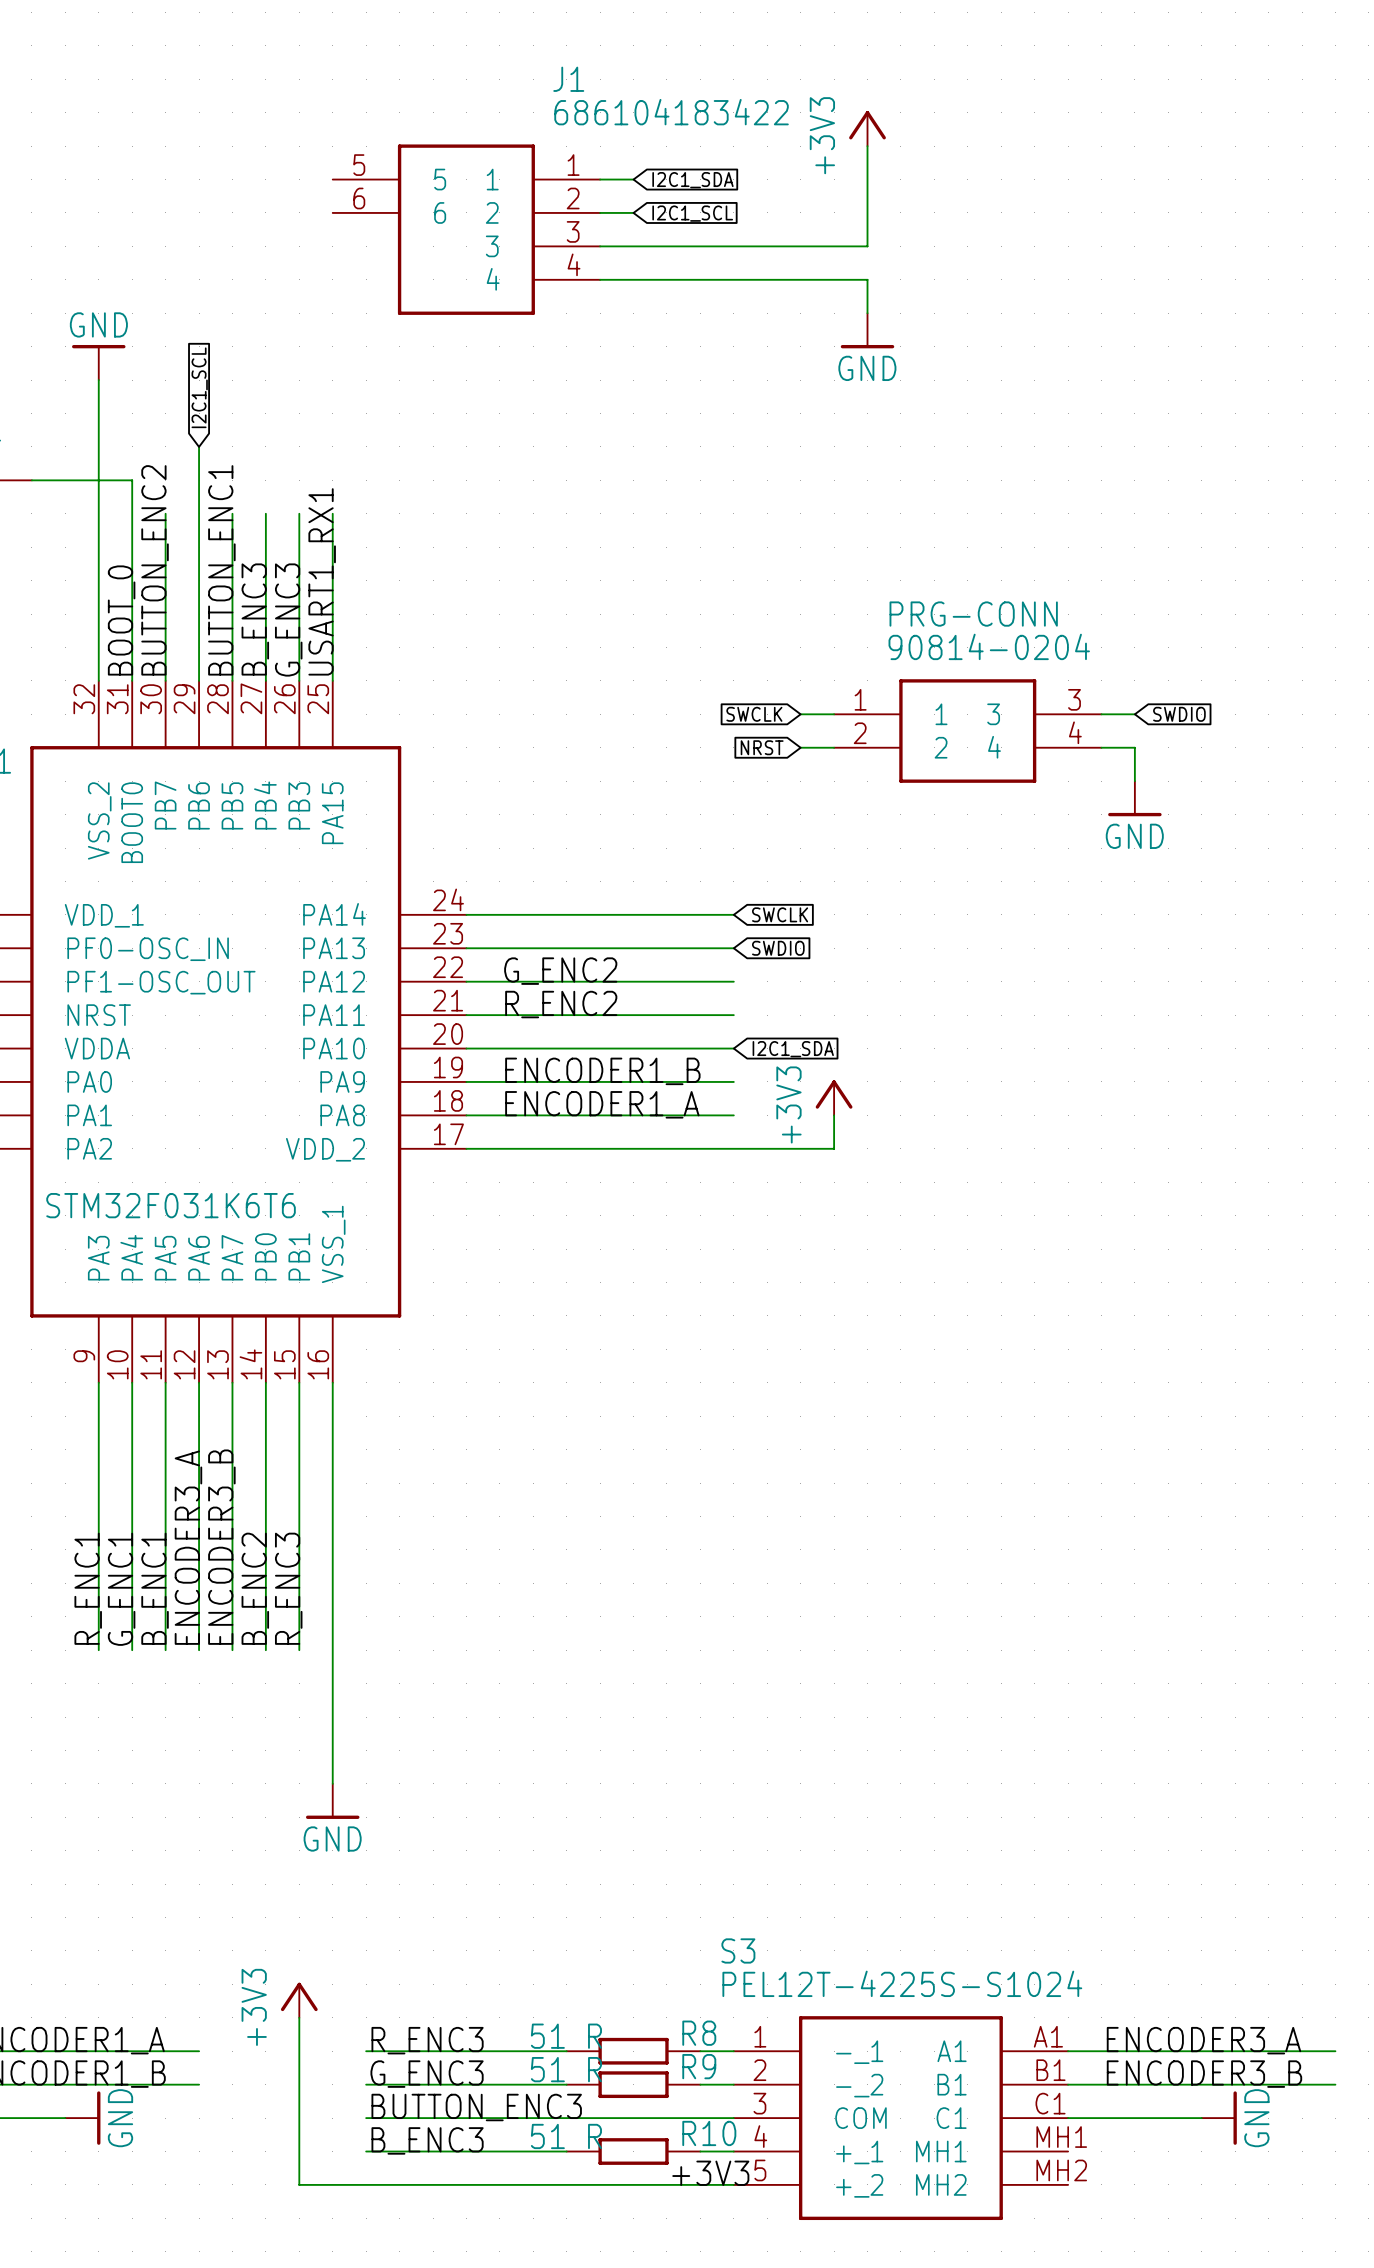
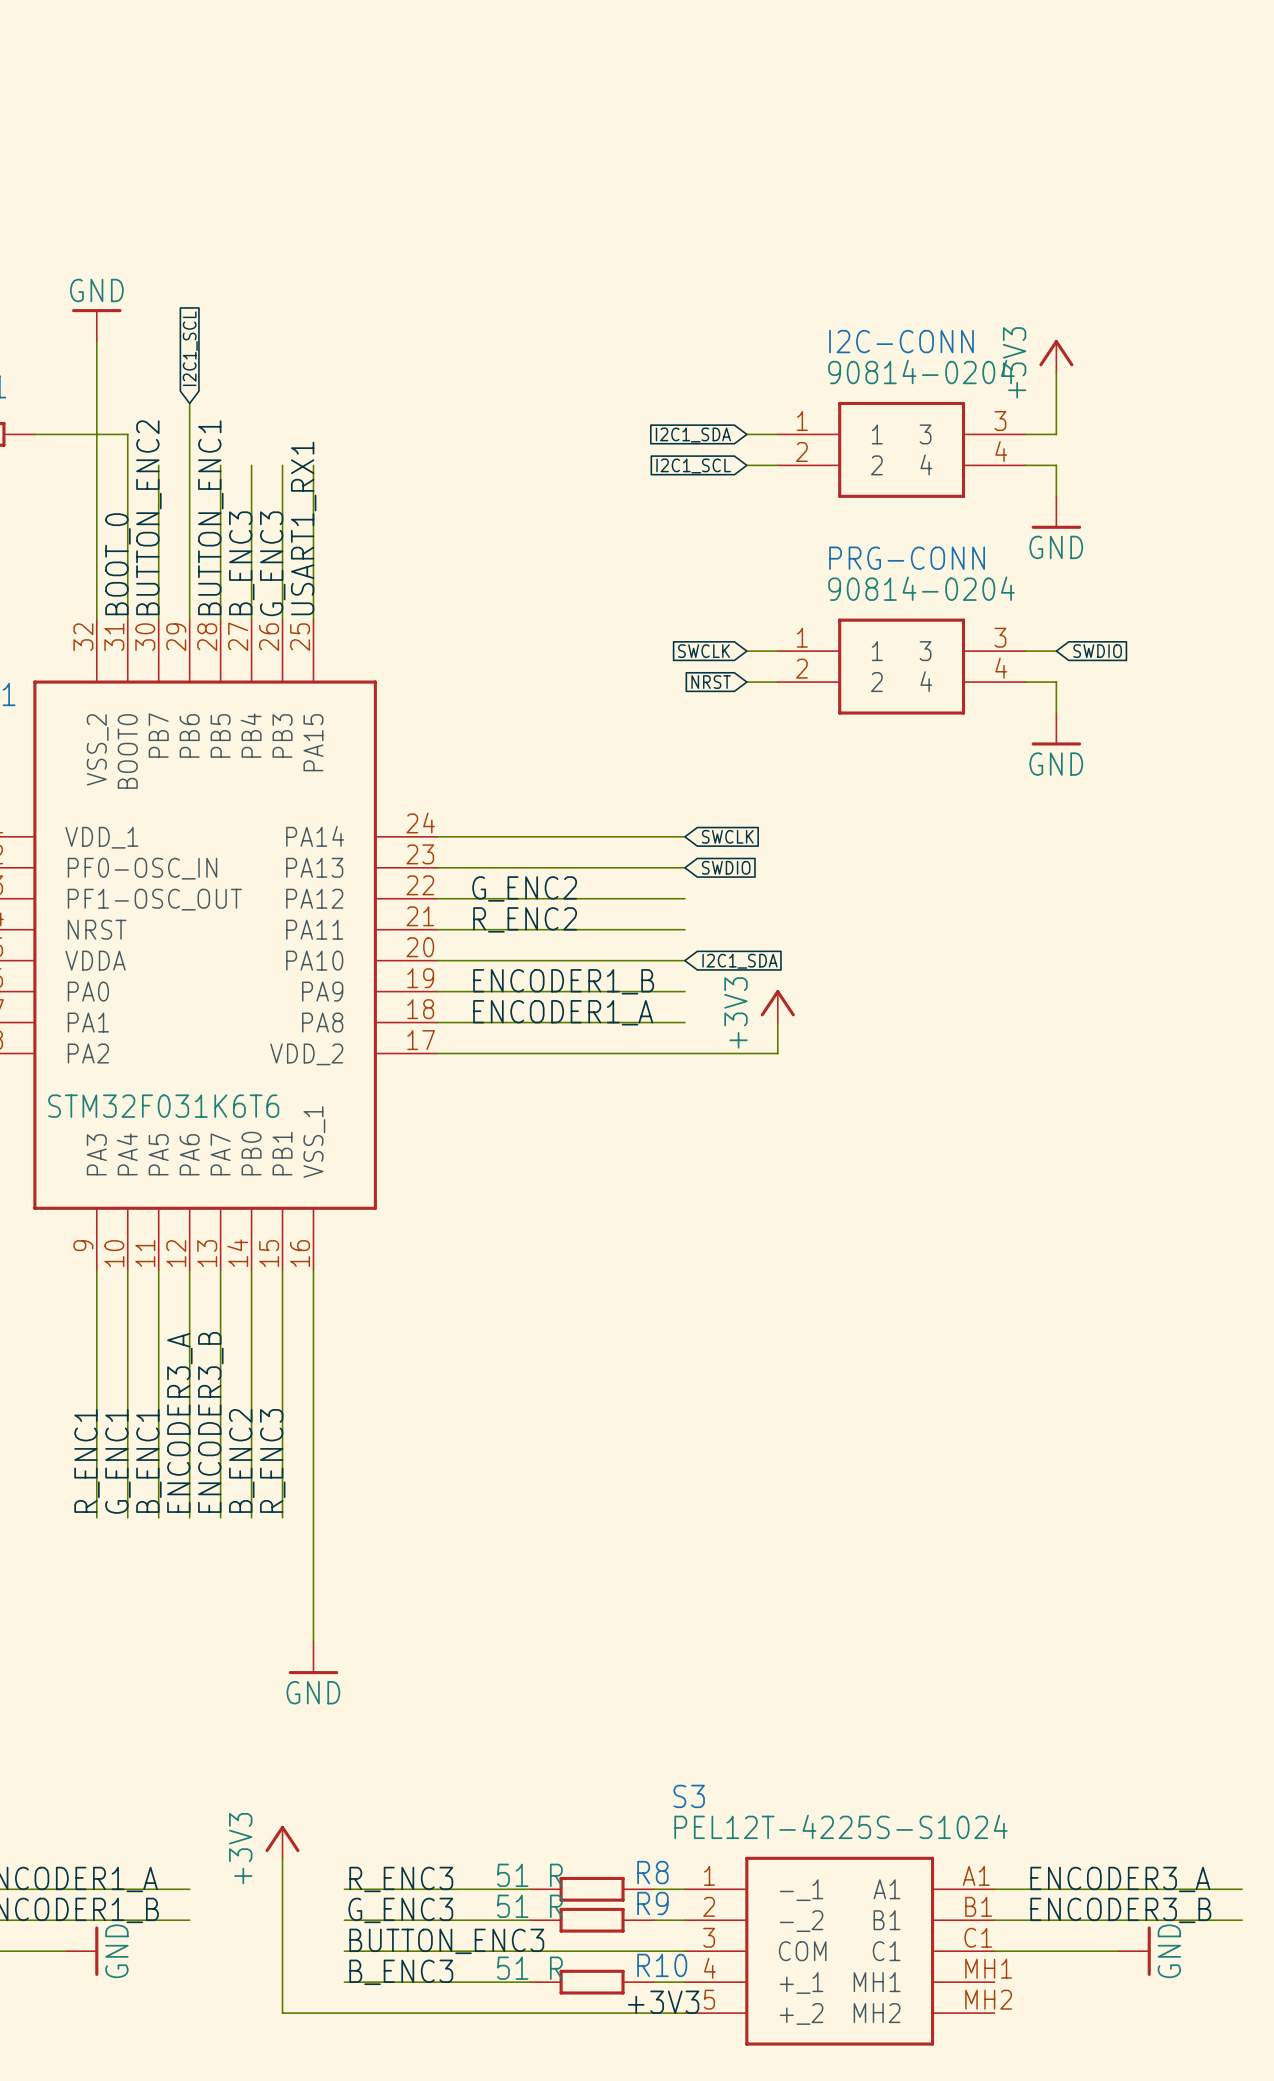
power symbol: +3V3 (867, 128) -> none
wire: (867, 146) (867, 246) (600, 246) -> none
wire: (600, 179) (633, 179) -> none
global label: I2C1_SDA (692, 180) -> none
wire: (600, 212) (633, 212) -> none
global label: I2C1_SCL (692, 213) -> none
J1: 686104183422 (466, 229) -> none
wire: (600, 279) (867, 279) (867, 313) -> none
power symbol: GND (867, 330) -> none
power symbol: none -> +3V3 (1056, 356)
wire: none -> (1056, 372) (1056, 434) (1025, 434)
global label: none -> I2C1_SDA (693, 435)
wire: none -> (746, 434) (777, 434)
I2C-CONN: none -> 90814-0204 (901, 449)
wire: none -> (746, 465) (777, 465)
wire: none -> (1025, 465) (1056, 465) (1056, 496)
global label: none -> I2C1_SCL (693, 465)
power symbol: none -> GND (1056, 512)

